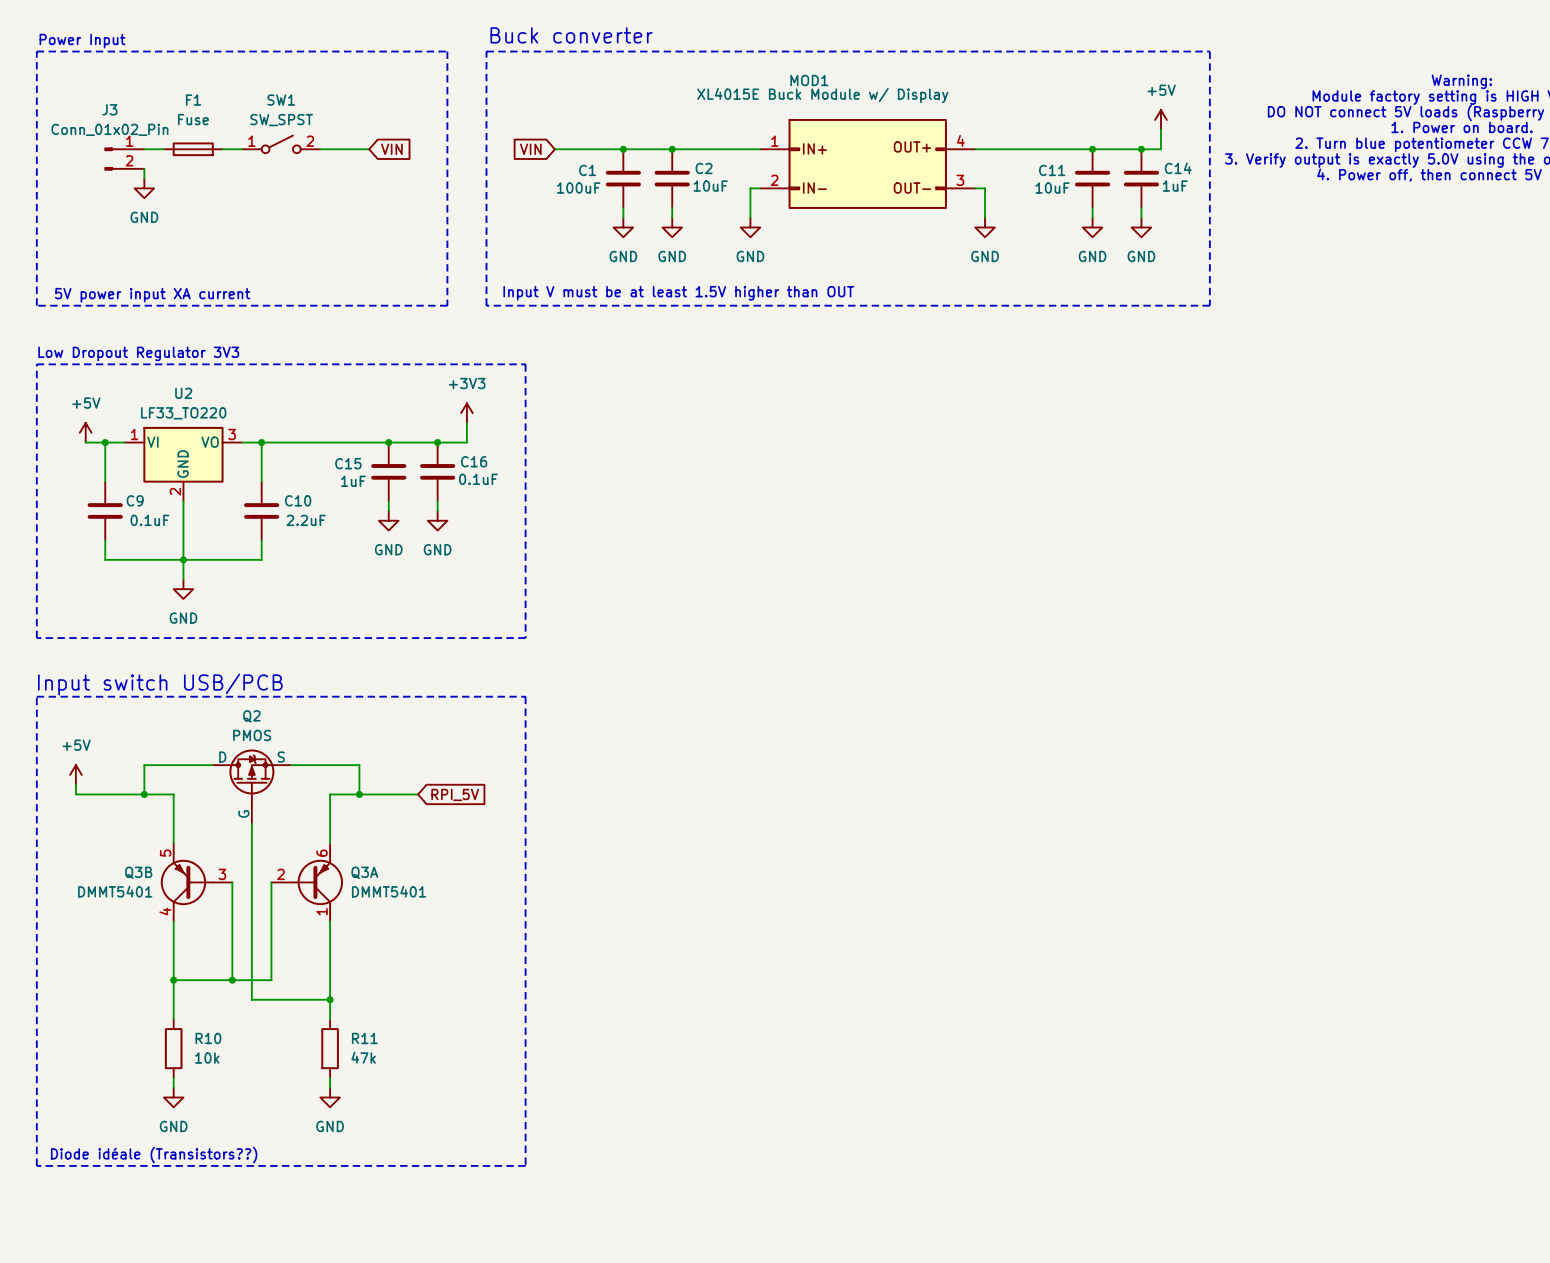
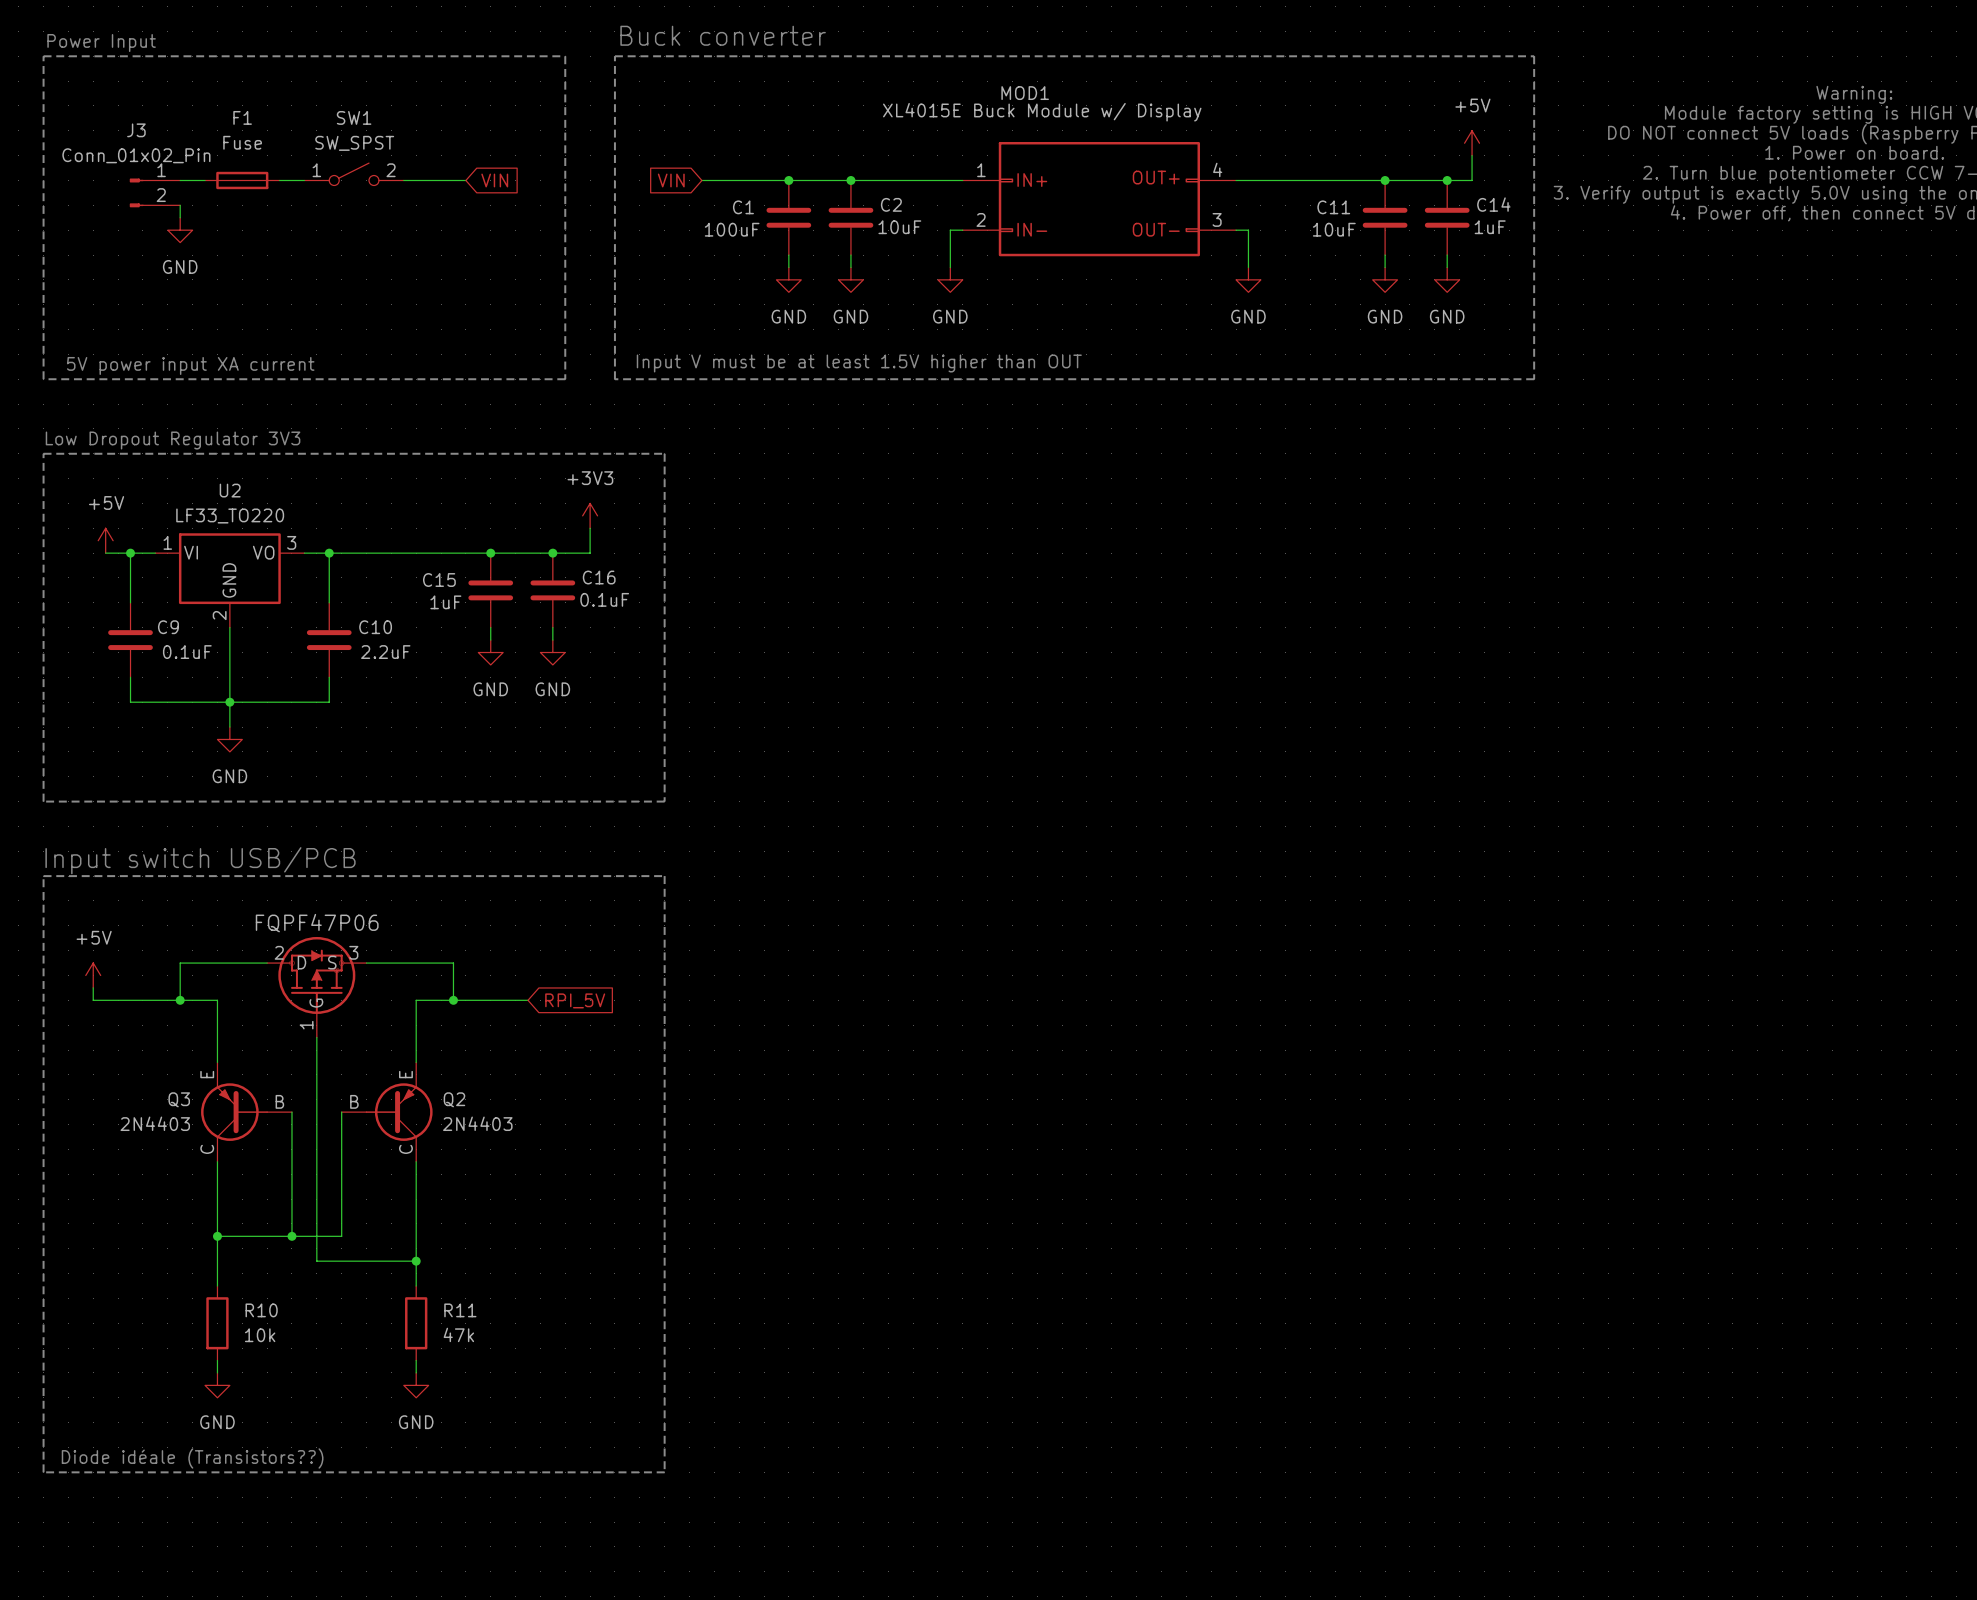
Q2 name position: Q2 (251, 716) -> Q2 (454, 1099)
Q2 value: PMOS (252, 735) -> 2N4403 (477, 1123)
Q2 symbol: [212, 749, 291, 824] -> [341, 1062, 433, 1162]
part: none -> FQPF47P06 (316, 987)
Q3B: DMMT5401 (196, 882) -> none
Q3: none -> 2N4403 (246, 1112)
Q3A: DMMT5401 (307, 882) -> none

